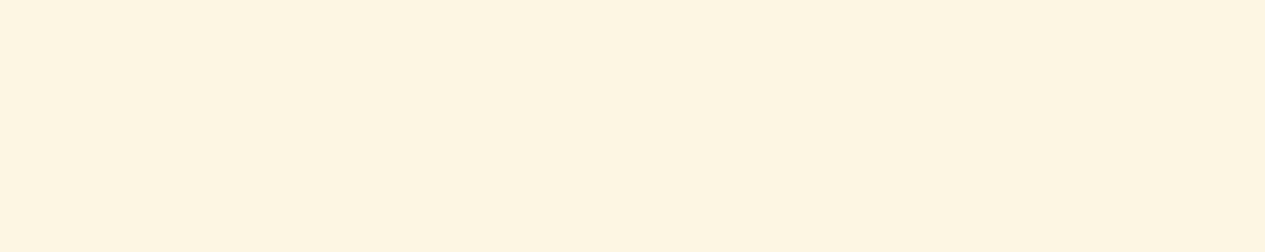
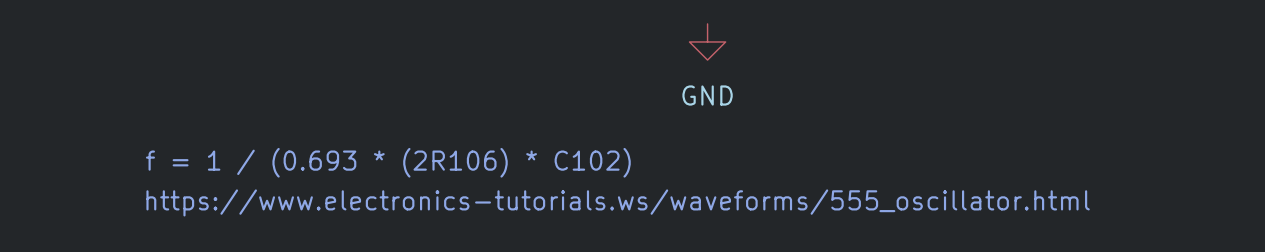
power symbol: none -> GND (707, 41)
text: none -> f = 1 / (0.693 * (2R106) * C102) (388, 162)
text: none -> https://www.electronics-tutorials.ws/waveforms/555_oscillator.html (618, 202)

